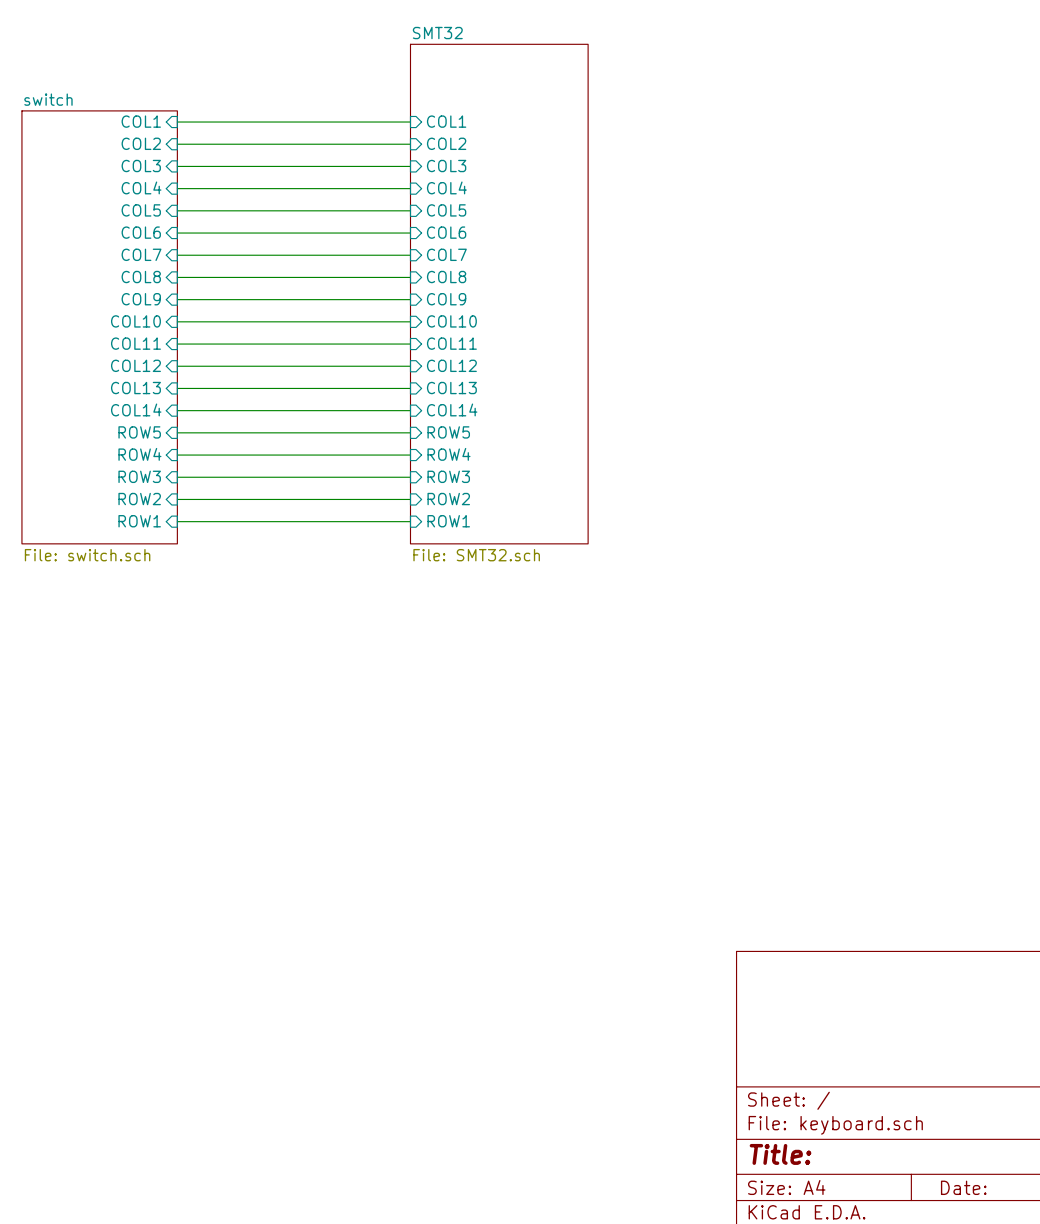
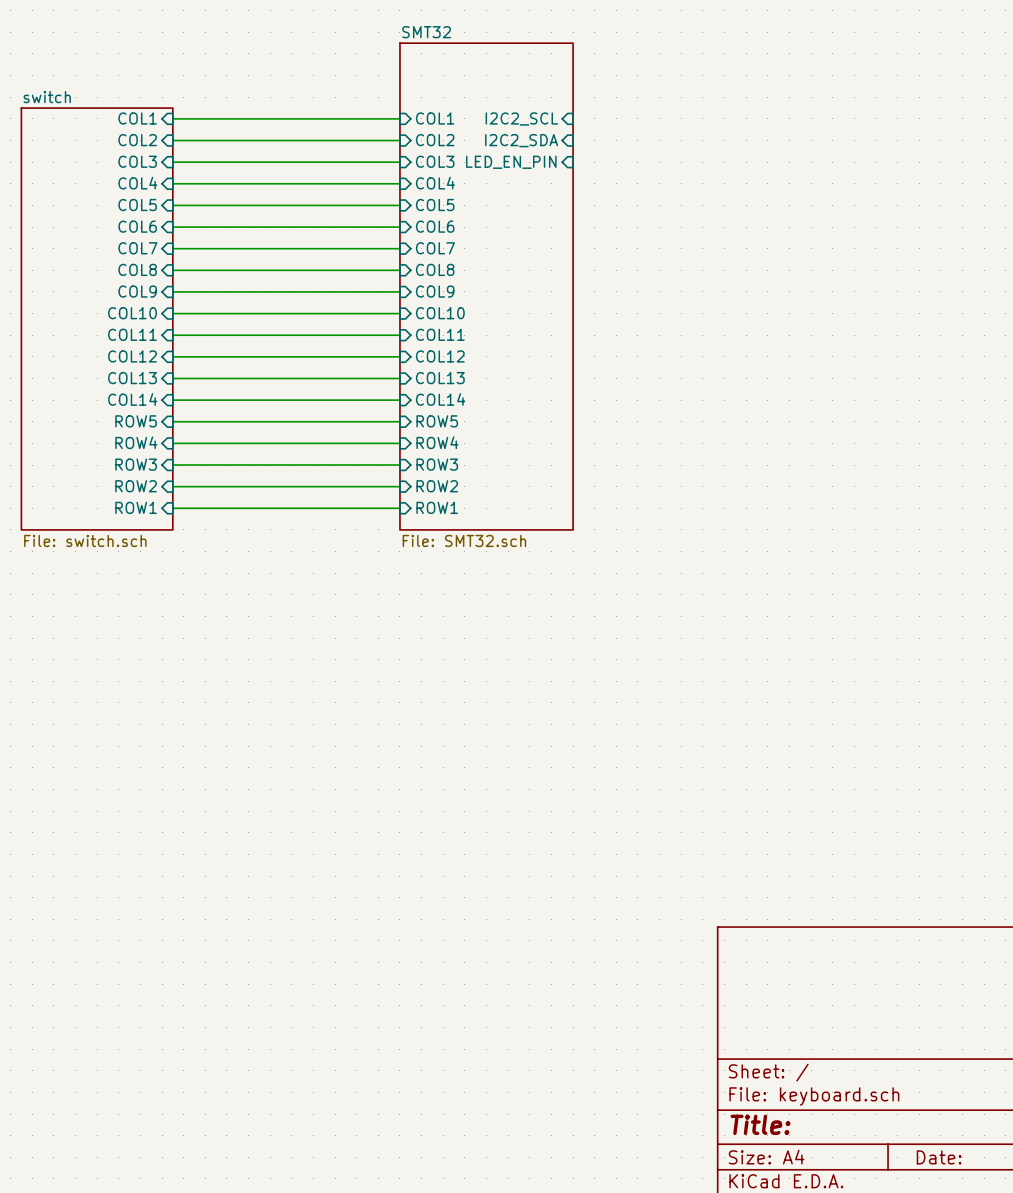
sheet pin: none -> I2C2_SCL (521, 119)
sheet pin: none -> I2C2_SDA (521, 140)
sheet pin: none -> LED_EN_PIN (511, 162)

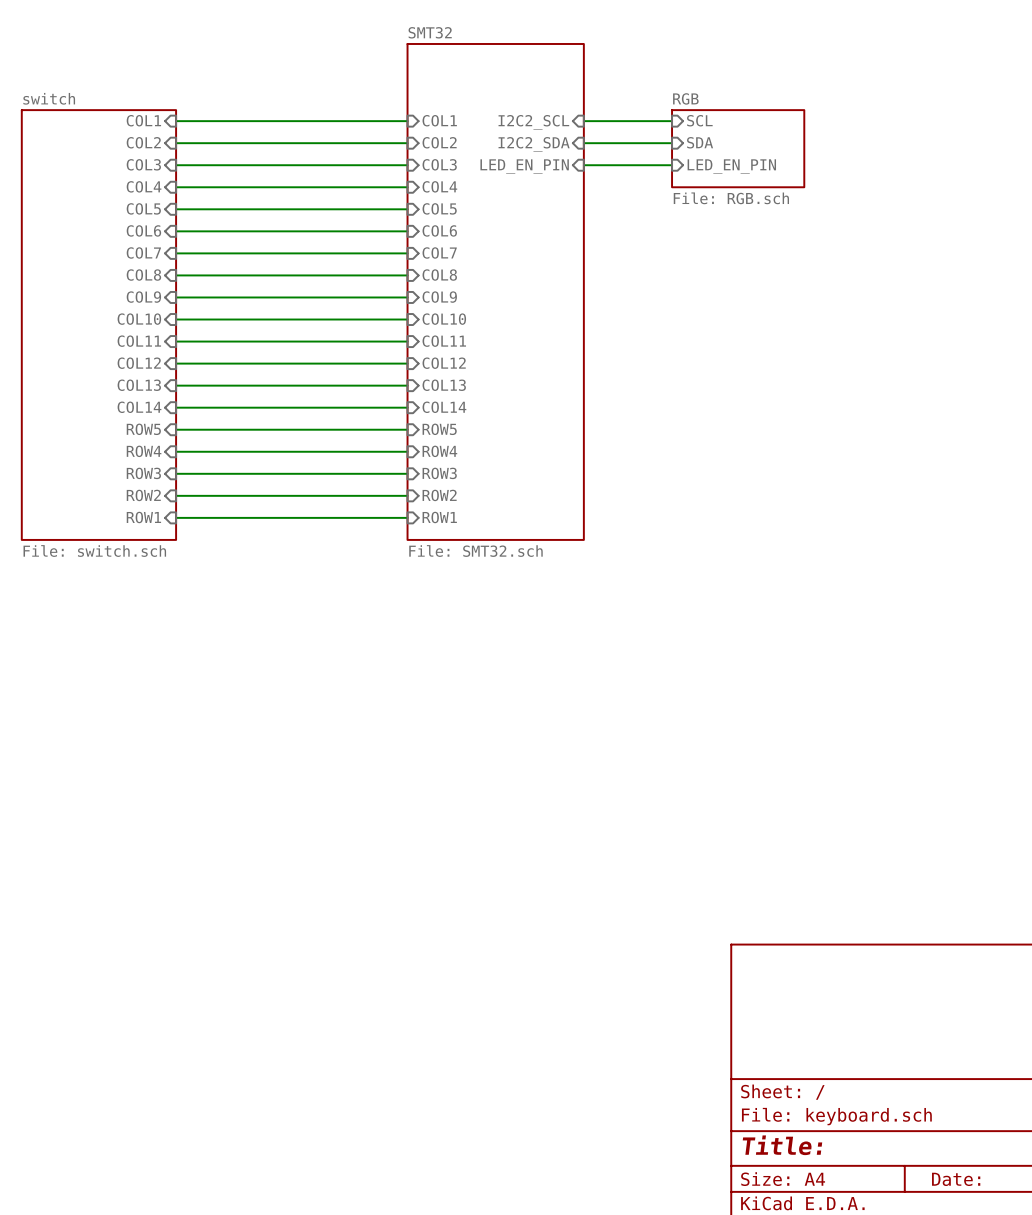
wire: none -> (583, 121) (672, 121)
sheet pin: none -> SCL (699, 120)
wire: none -> (583, 143) (672, 143)
sheet pin: none -> SDA (700, 142)
sheet RGB: none -> File: RGB.sch (738, 148)
wire: none -> (583, 165) (672, 165)
sheet pin: none -> LED_EN_PIN (731, 166)

